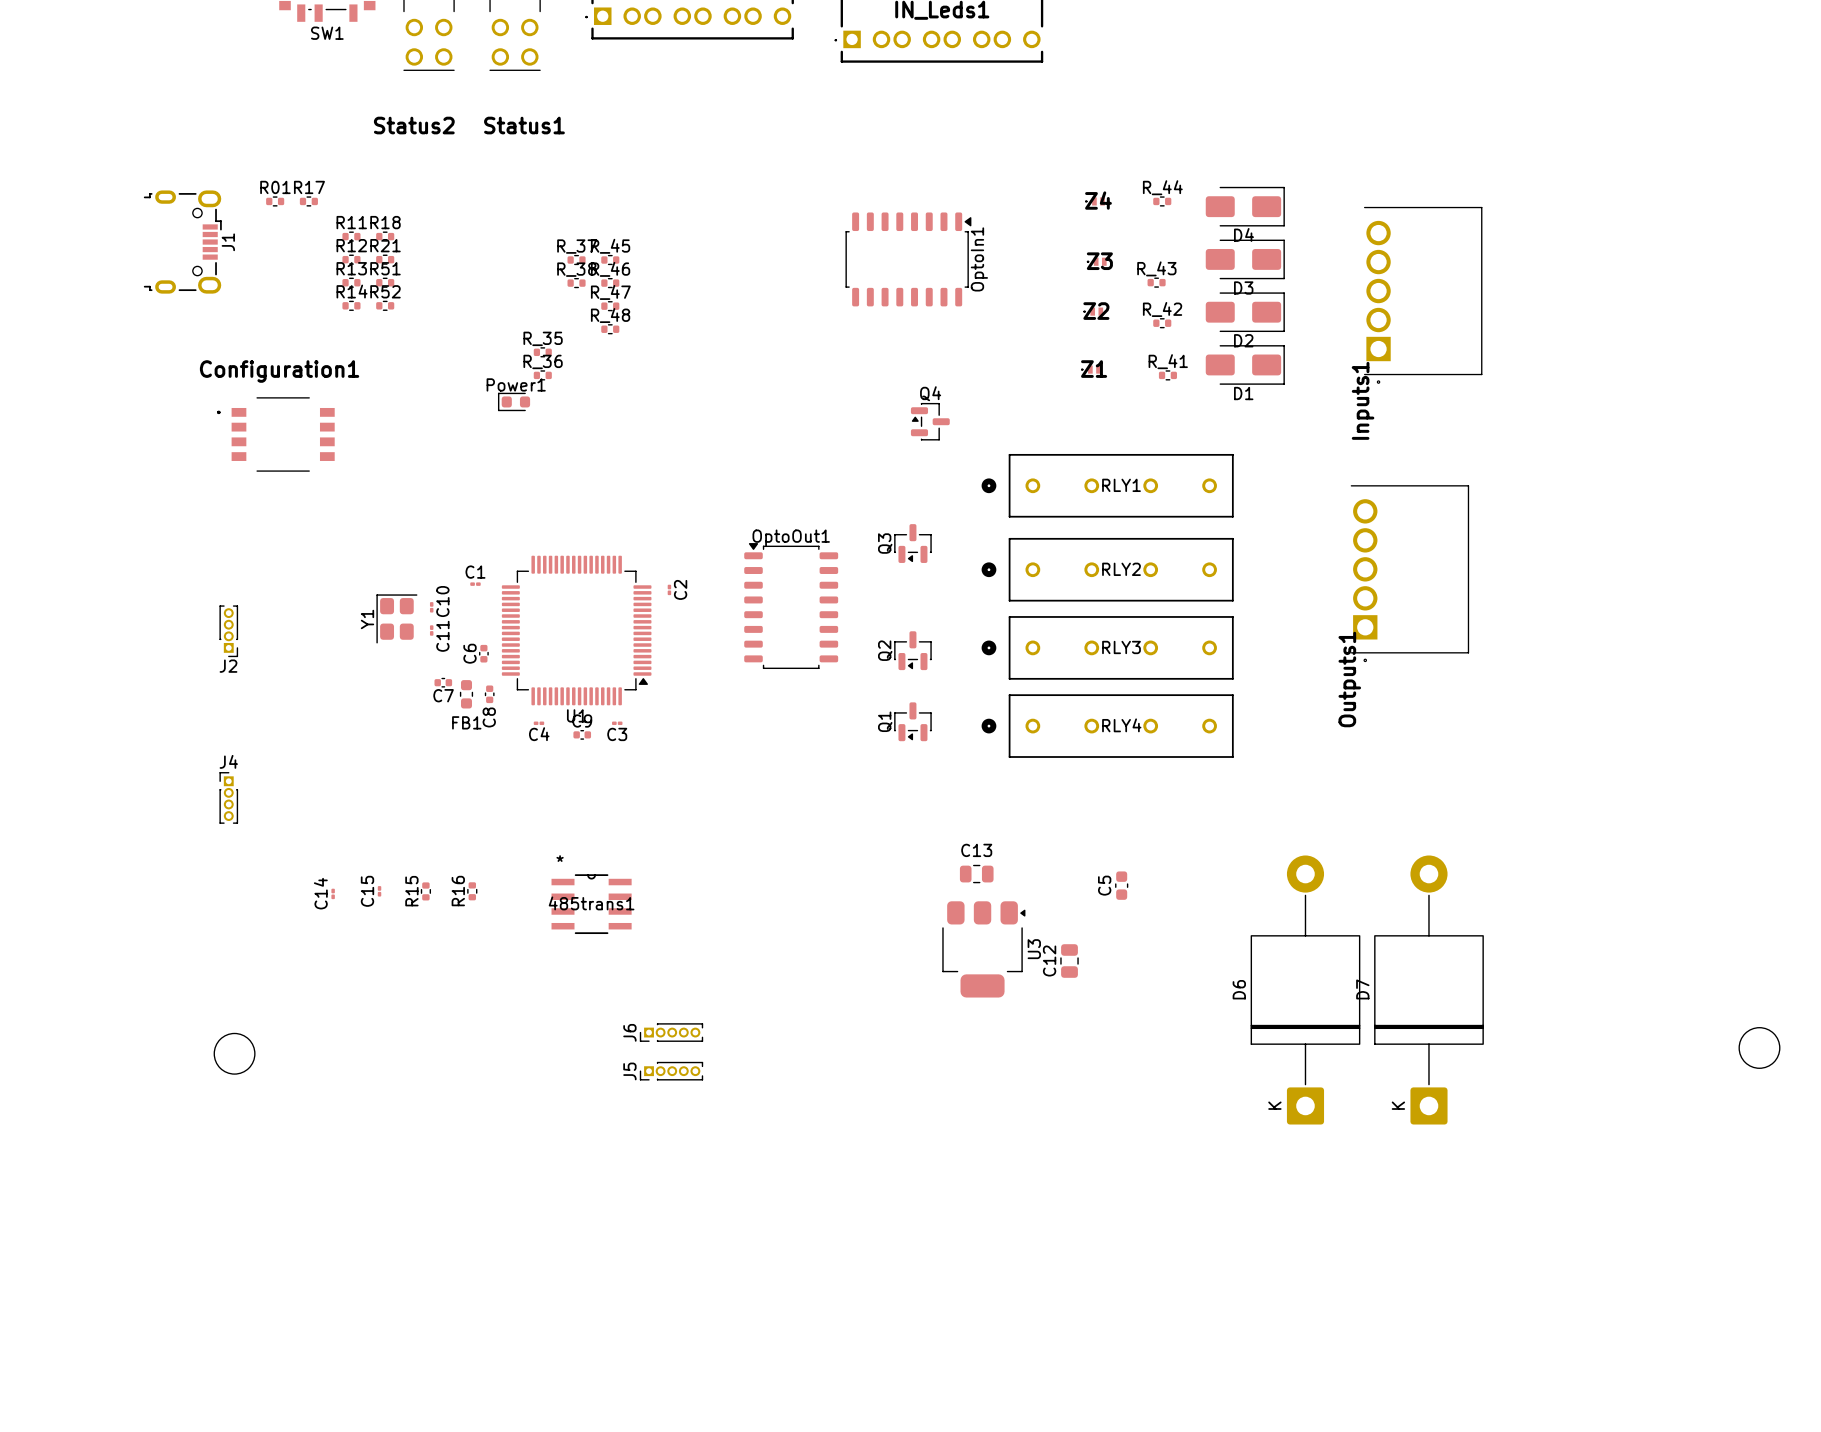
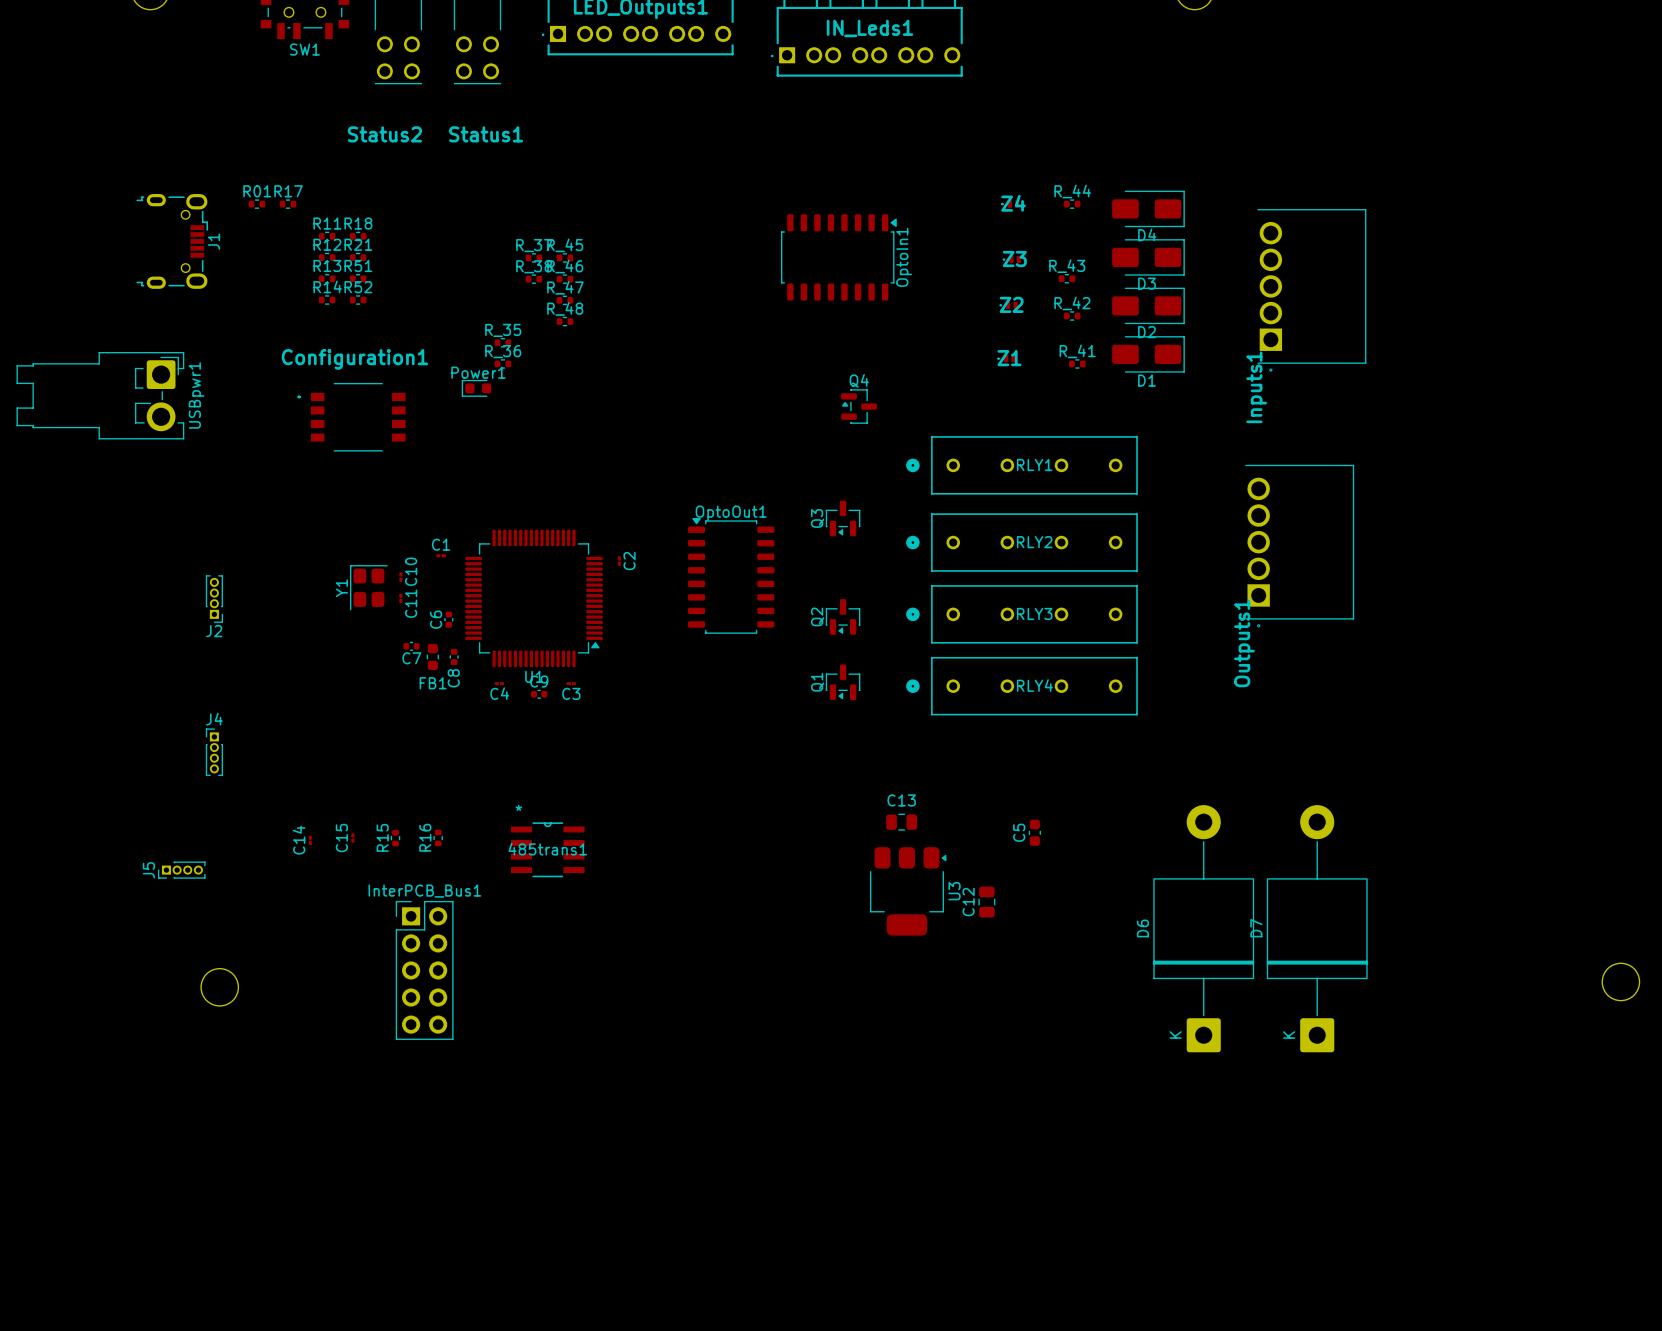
USBpwr1: none -> (100, 395)
Configuration1 position: (275, 434) -> (351, 417)
J6: (671, 1032) -> none
InterPCB_Bus1: none -> (424, 970)
J5 footprint: [639, 1061, 704, 1081] -> [157, 861, 206, 879]

